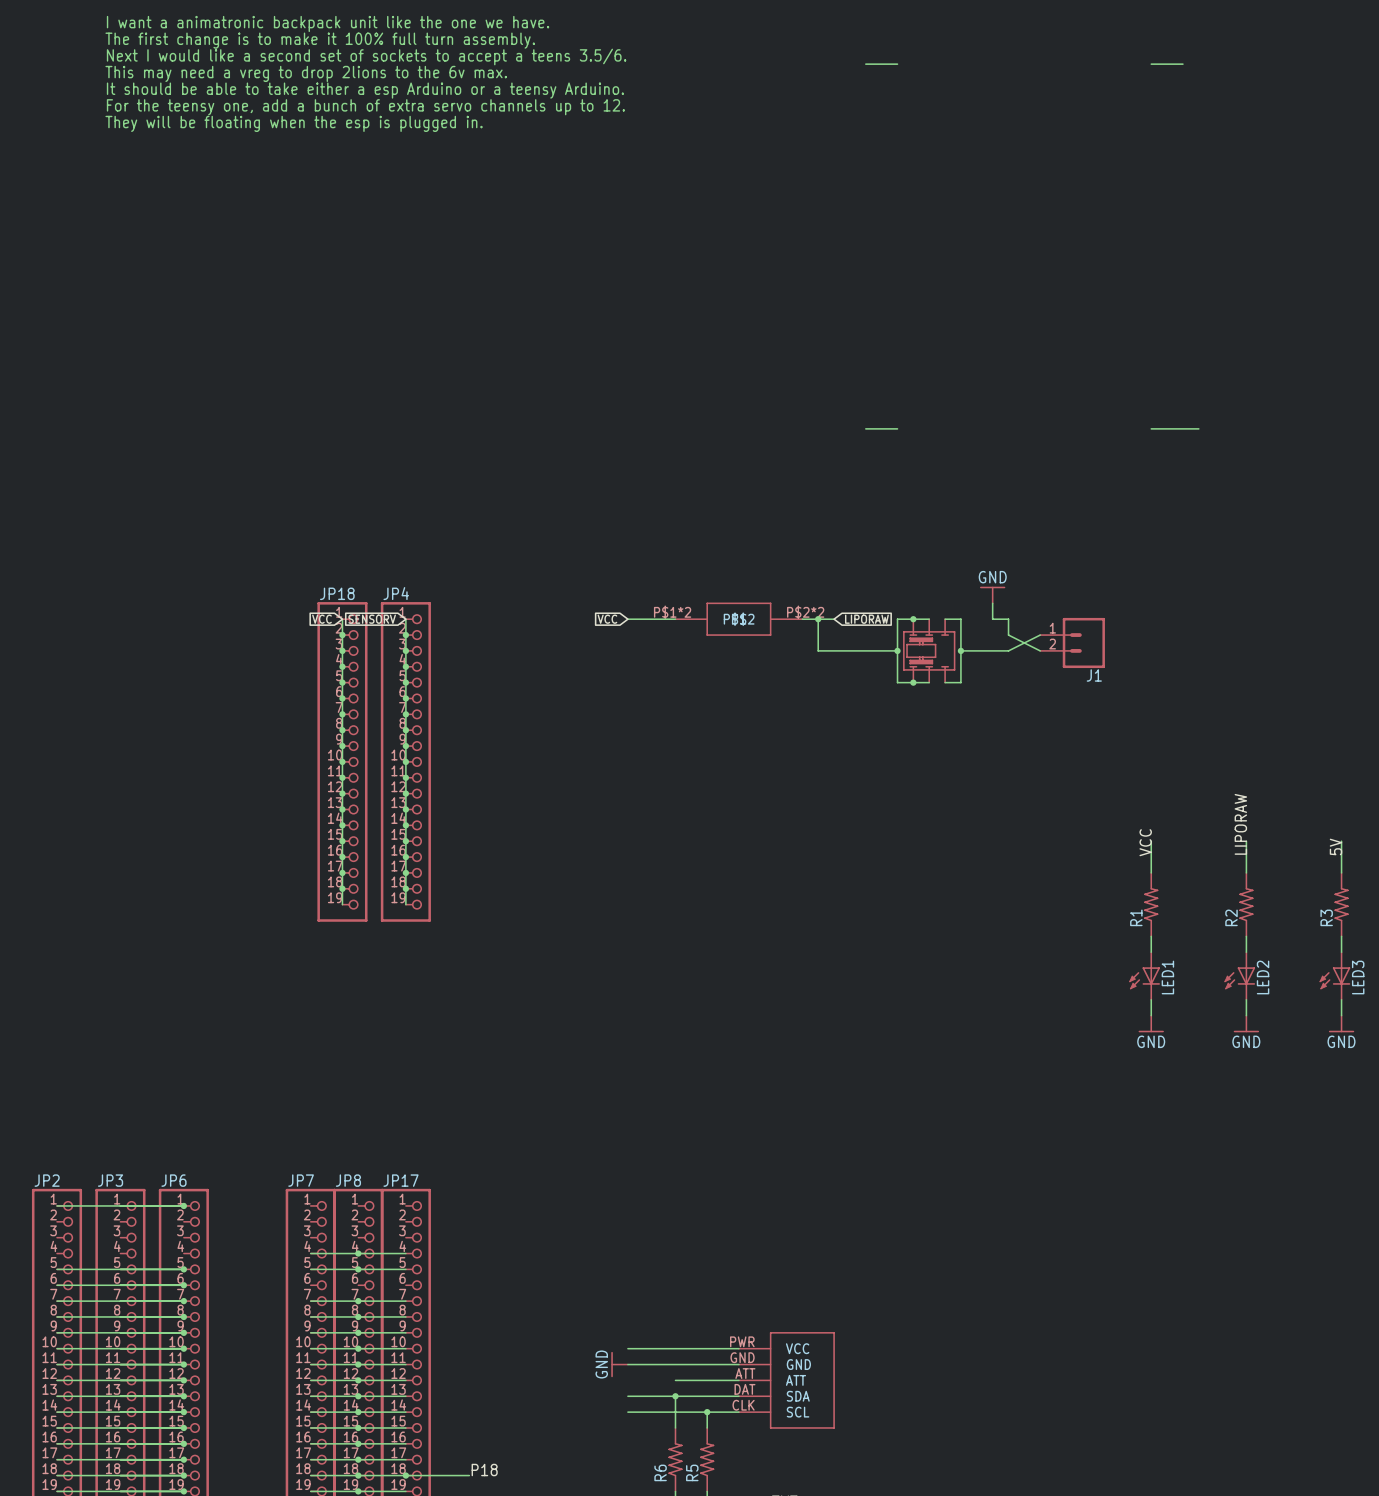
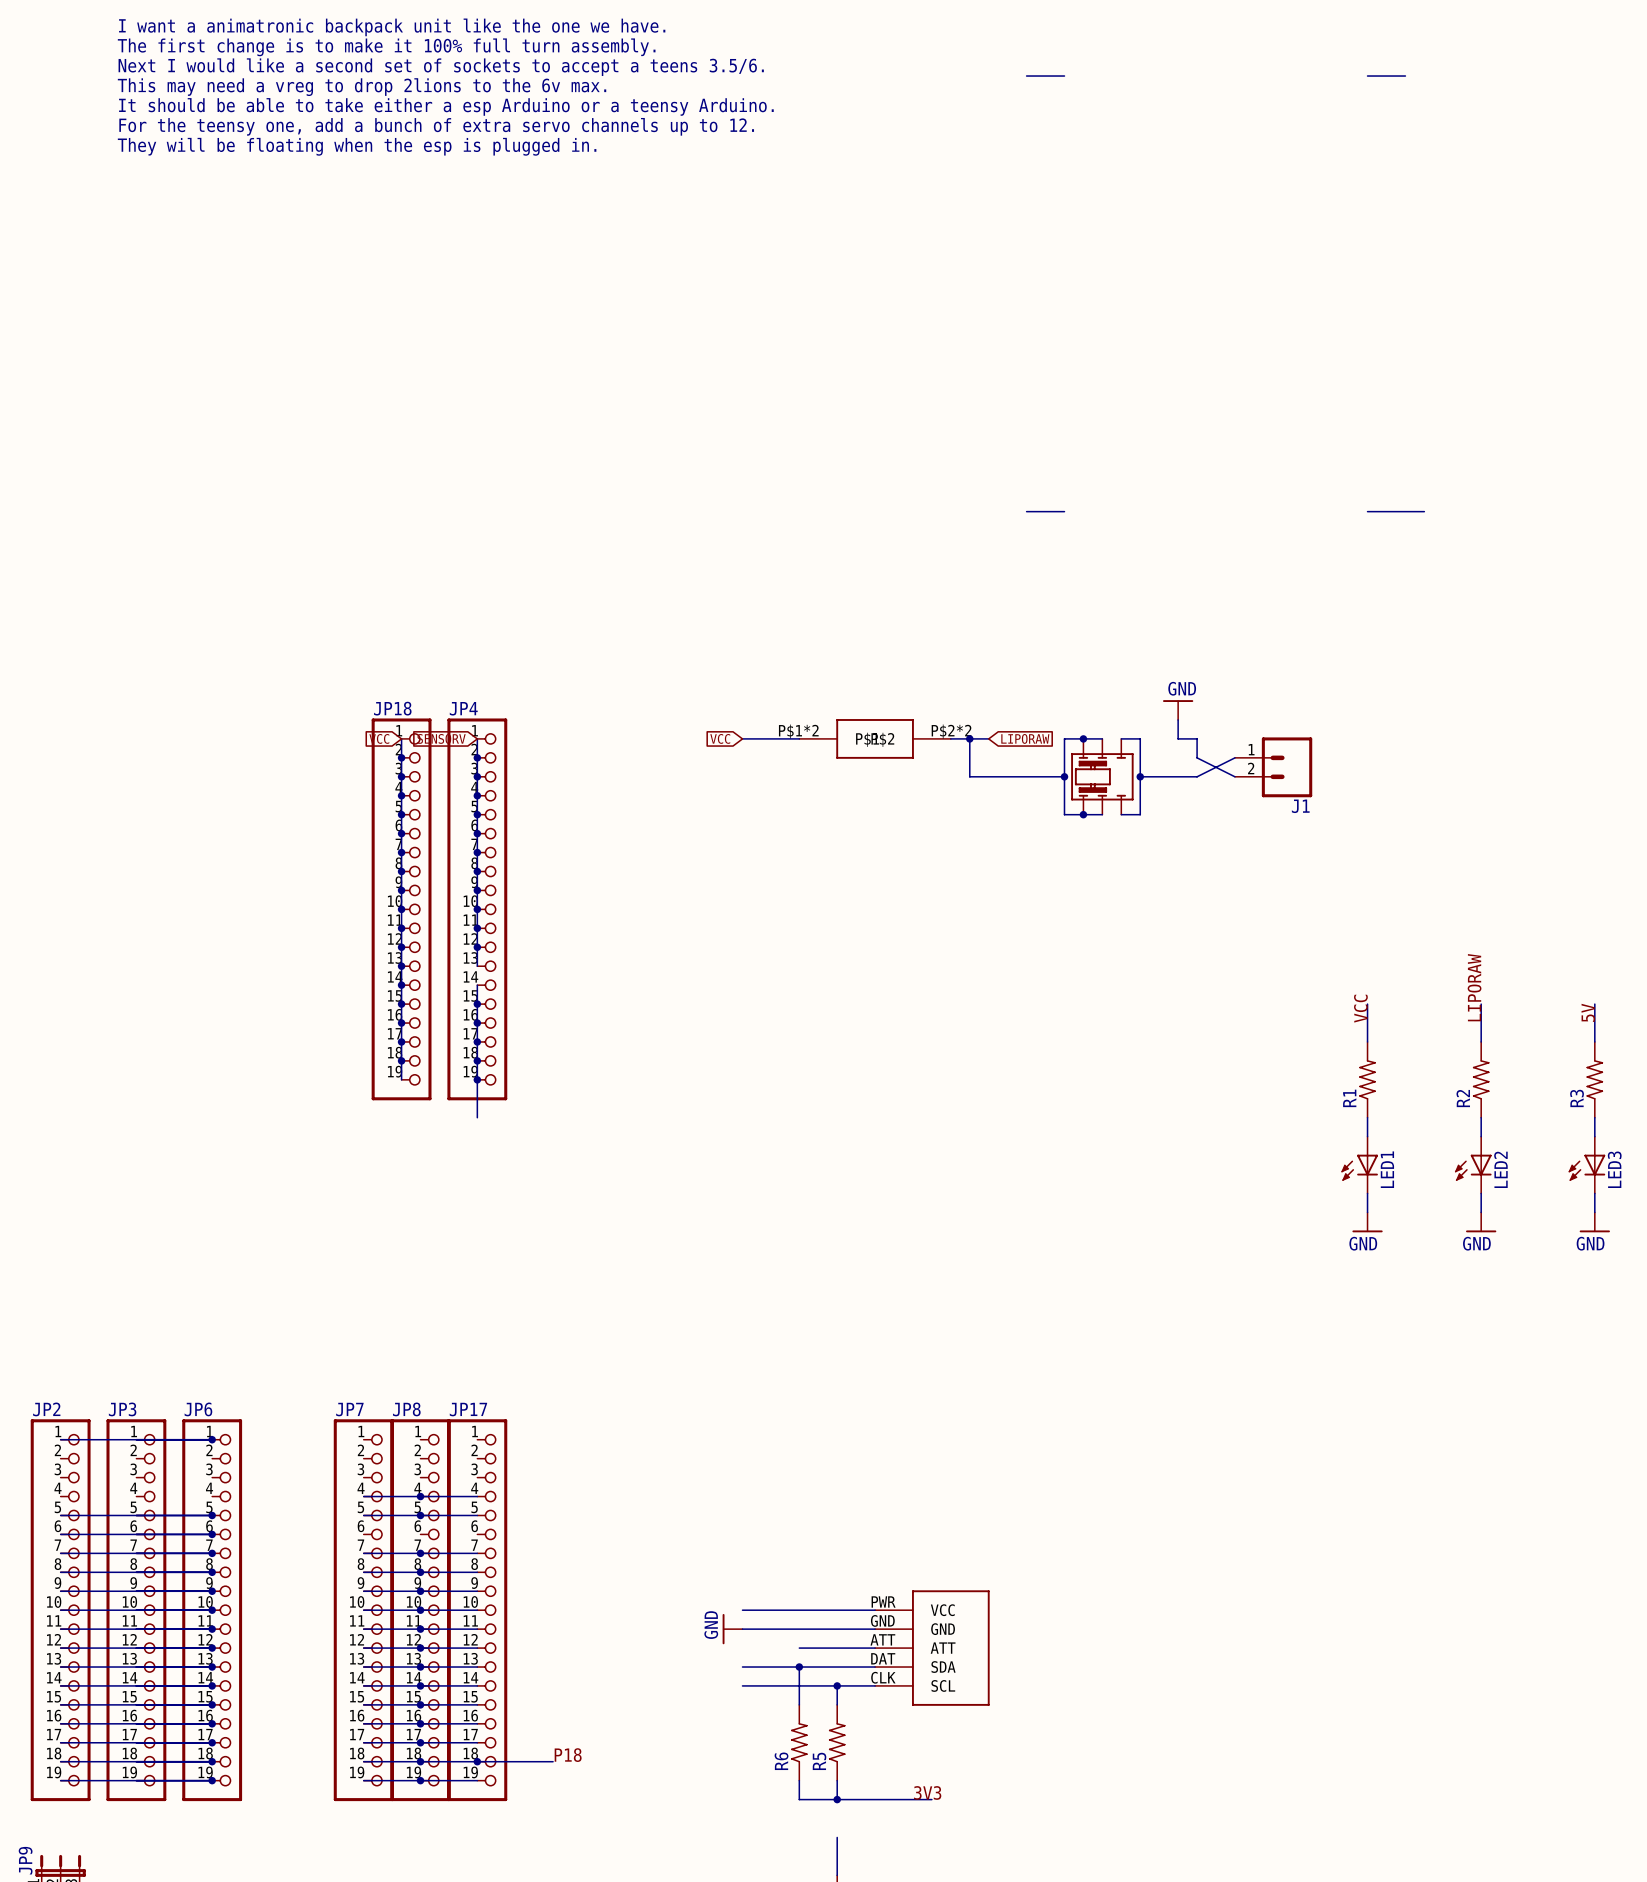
wire: (405, 809) (405, 825) -> none
junction: (405, 809) -> none
junction: (405, 825) -> none
wire: none -> (477, 1079) (477, 1117)
junction: none -> (477, 1079)

